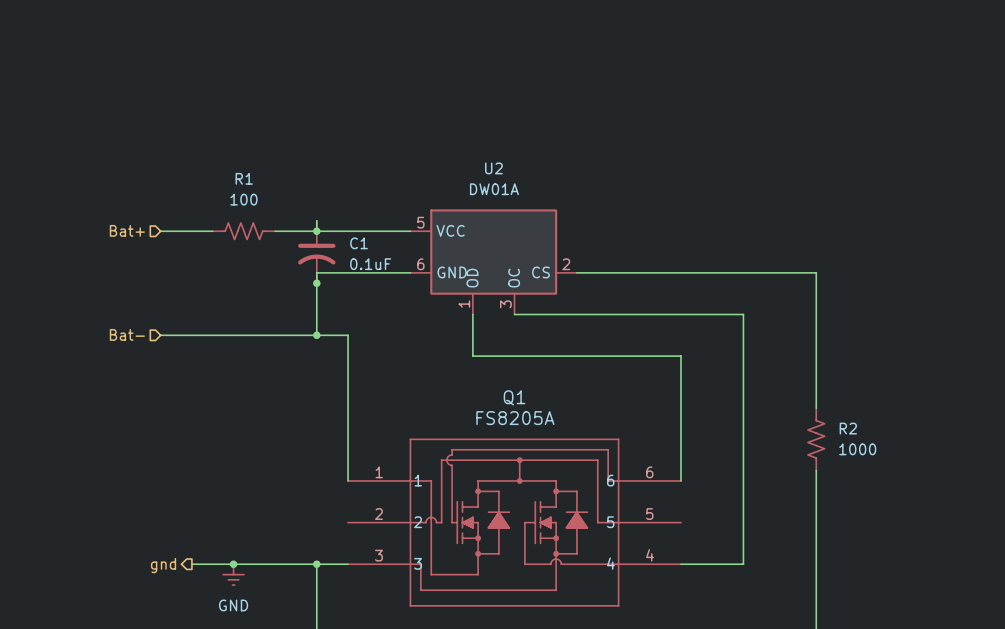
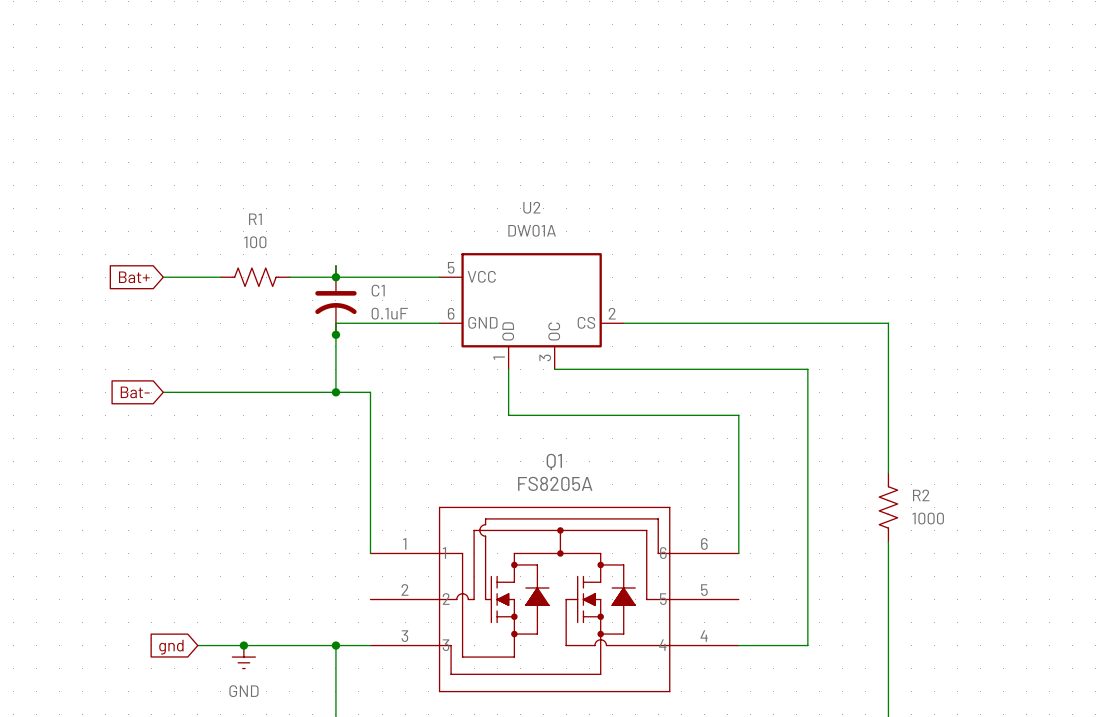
hierarchical label: Bat+ (127, 230) -> none
global label: none -> Bat+ (134, 277)
hierarchical label: Bat- (127, 334) -> none
global label: none -> Bat- (135, 392)
hierarchical label: gnd (163, 565) -> none
global label: none -> gnd (171, 647)

